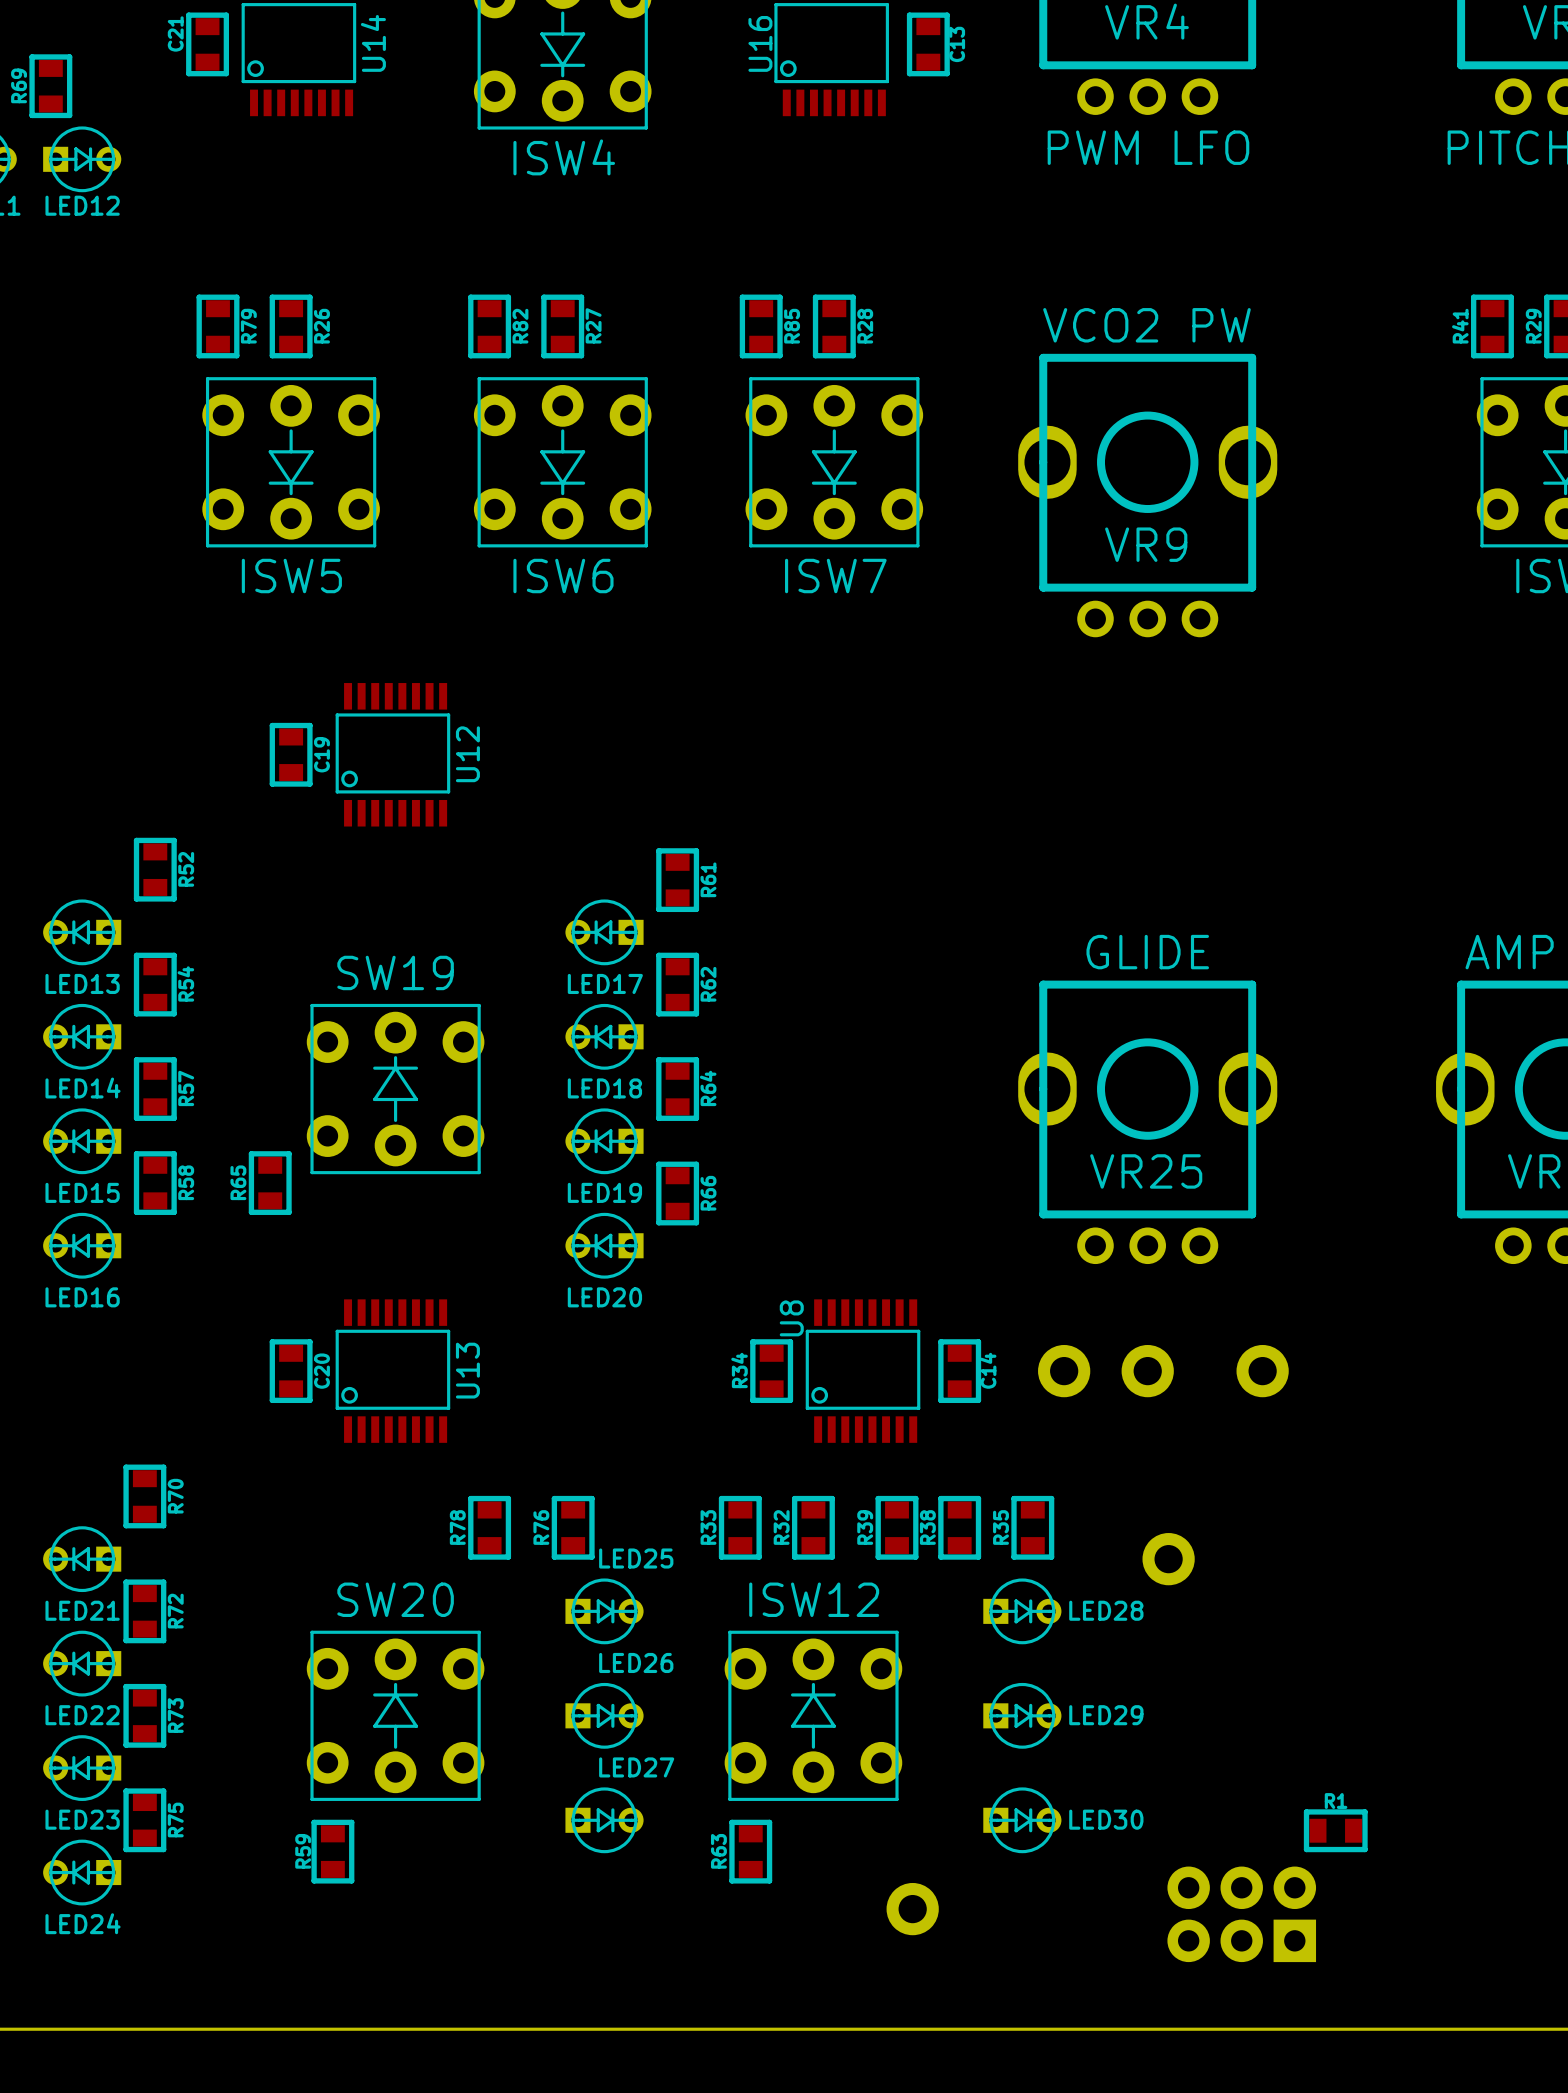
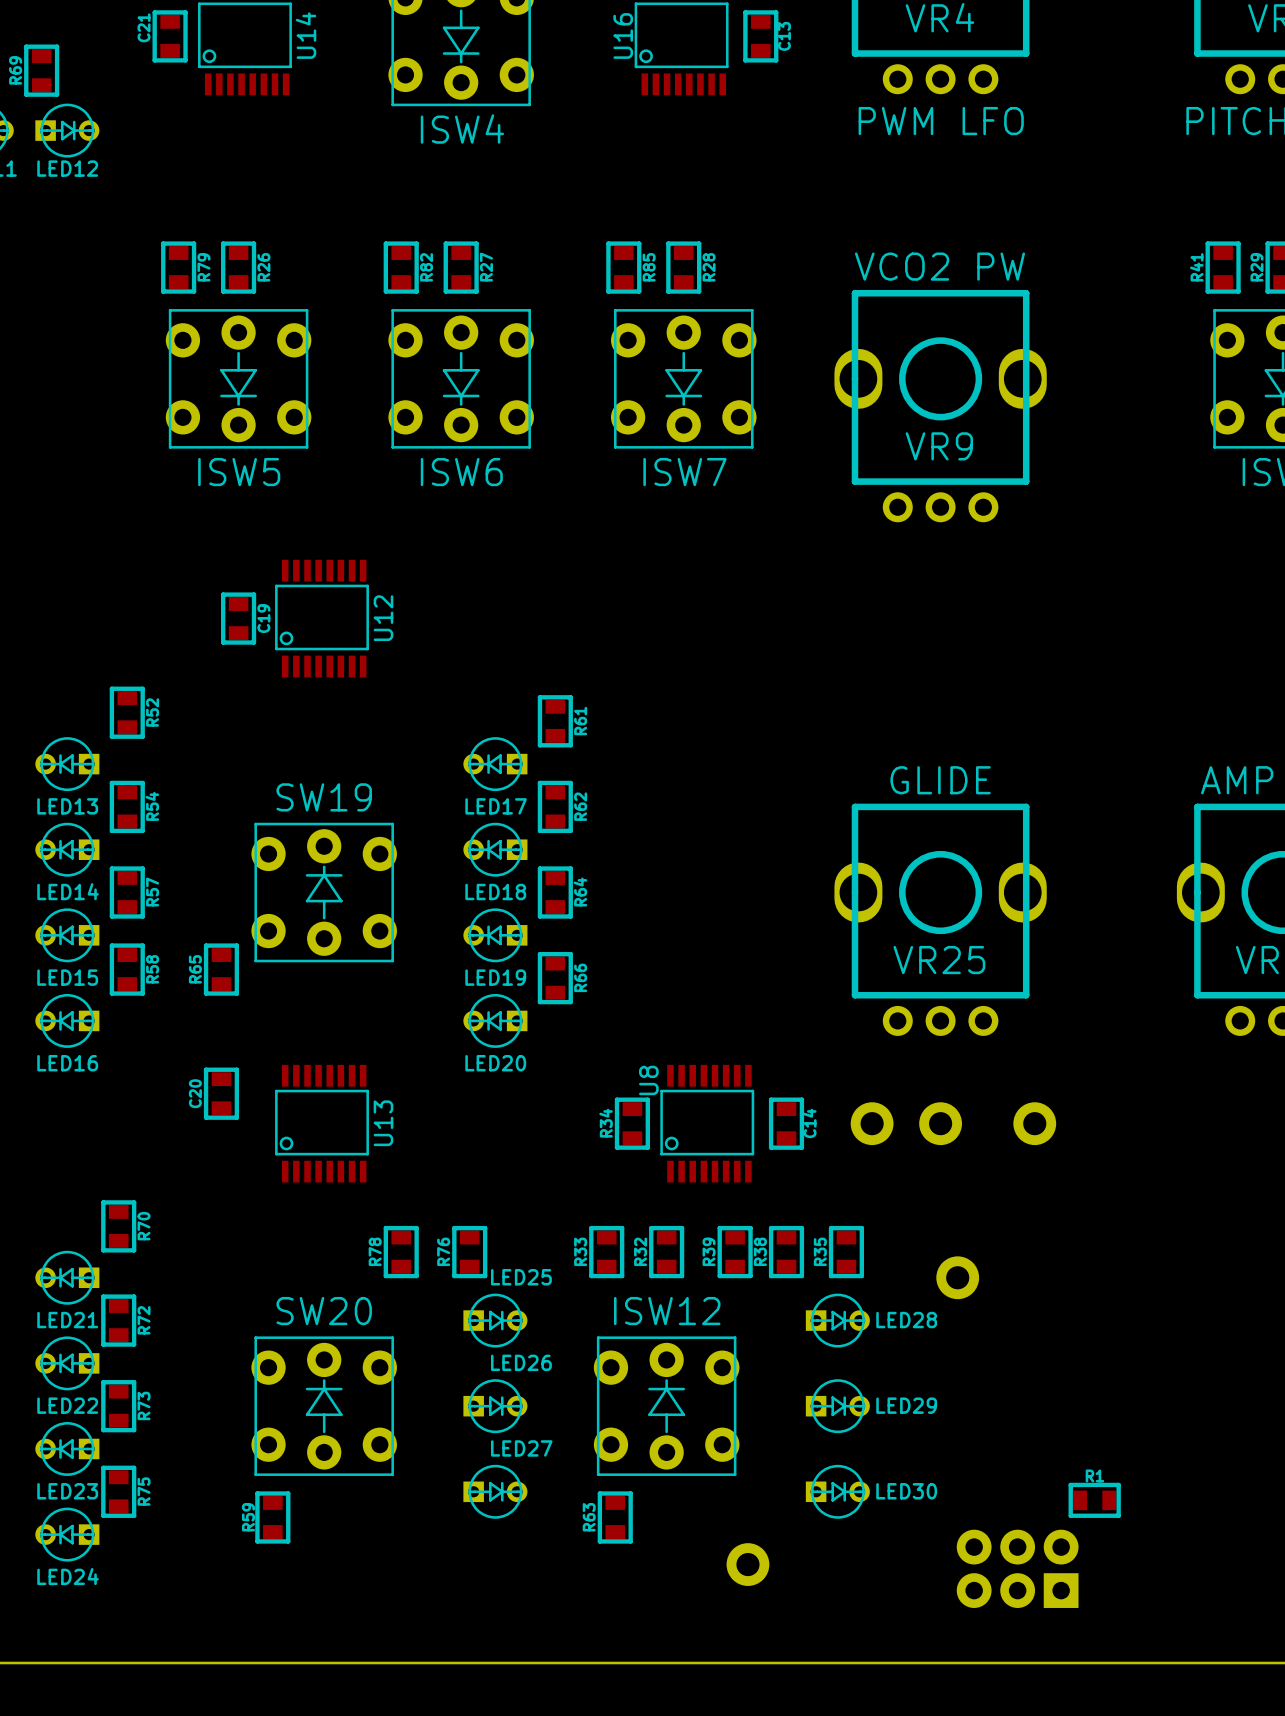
C20 position: (291, 1371) -> (221, 1093)
C20 name position: C20 (321, 1371) -> C20 (195, 1093)

